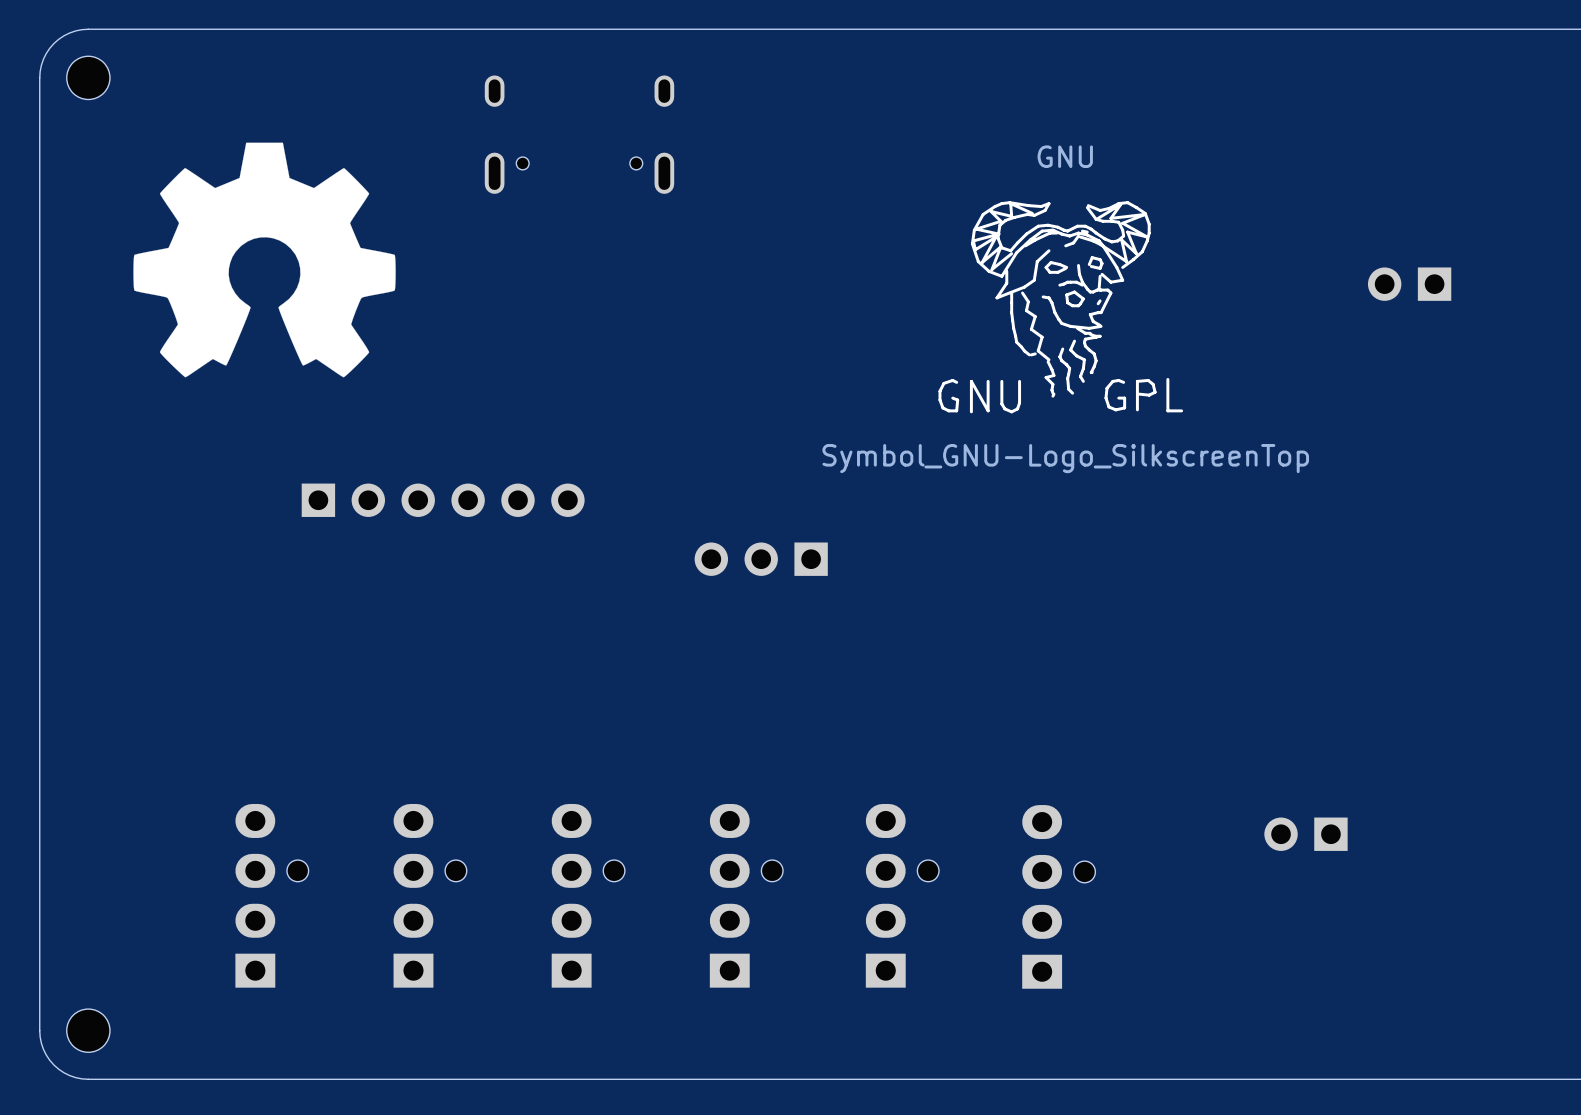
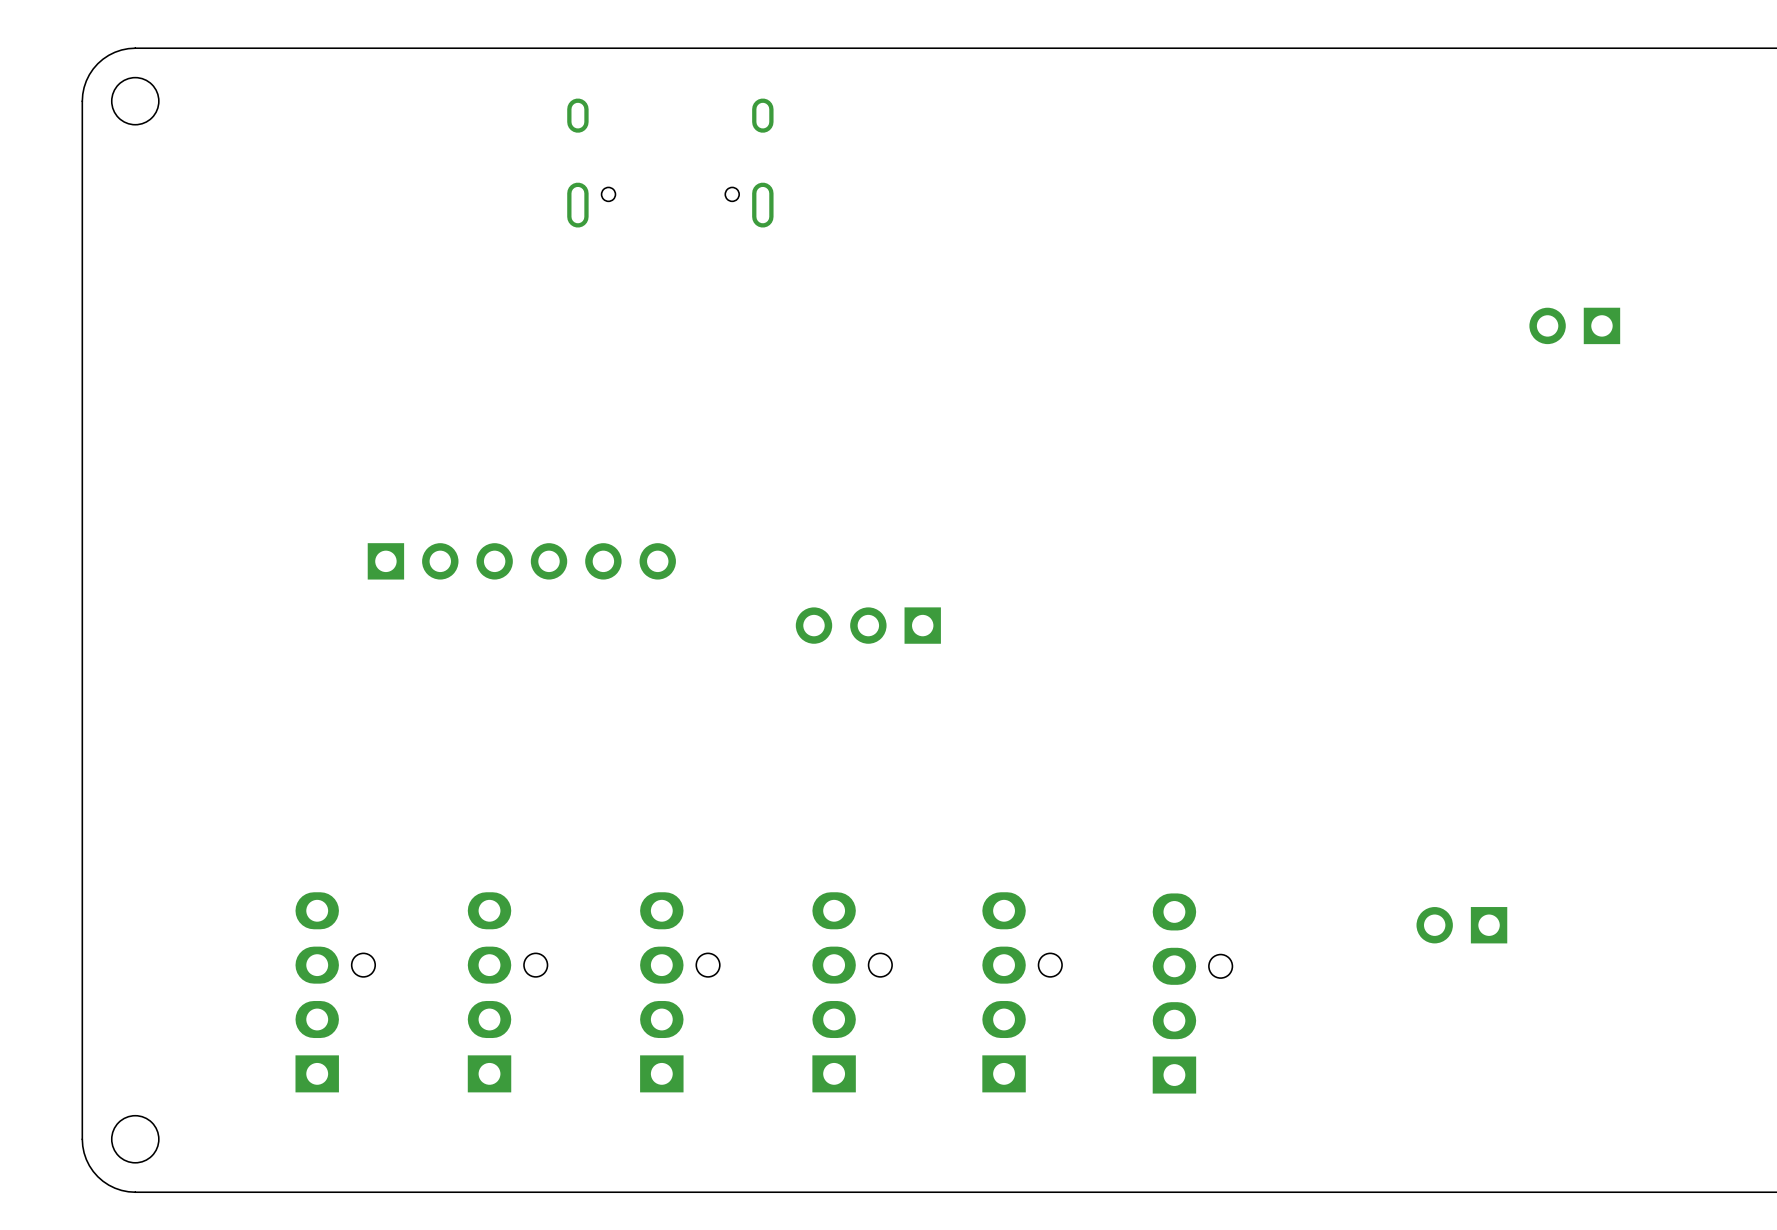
drawing: [133, 142, 396, 378] -> none
GNU: Symbol_GNU-Logo_SilkscreenTop (1060, 307) -> none

